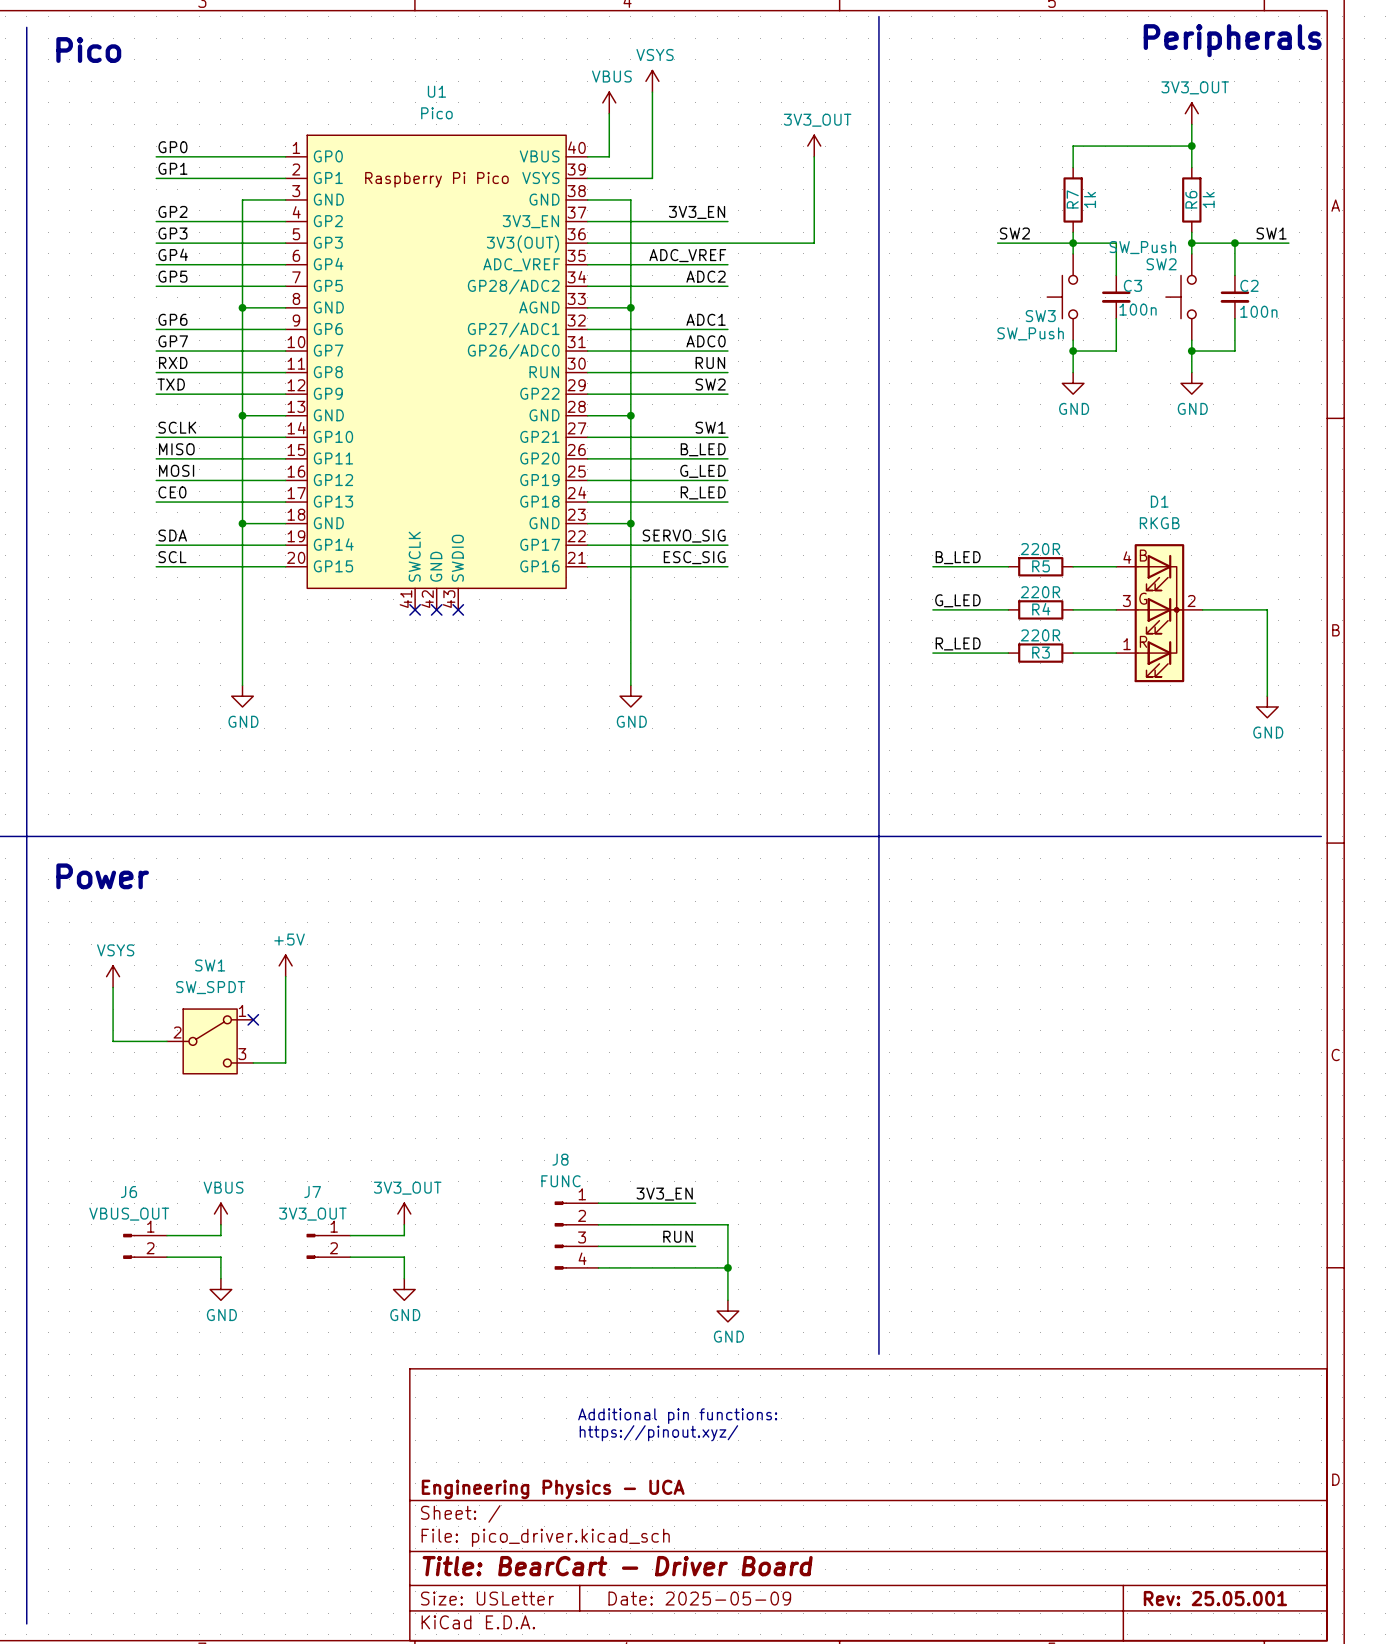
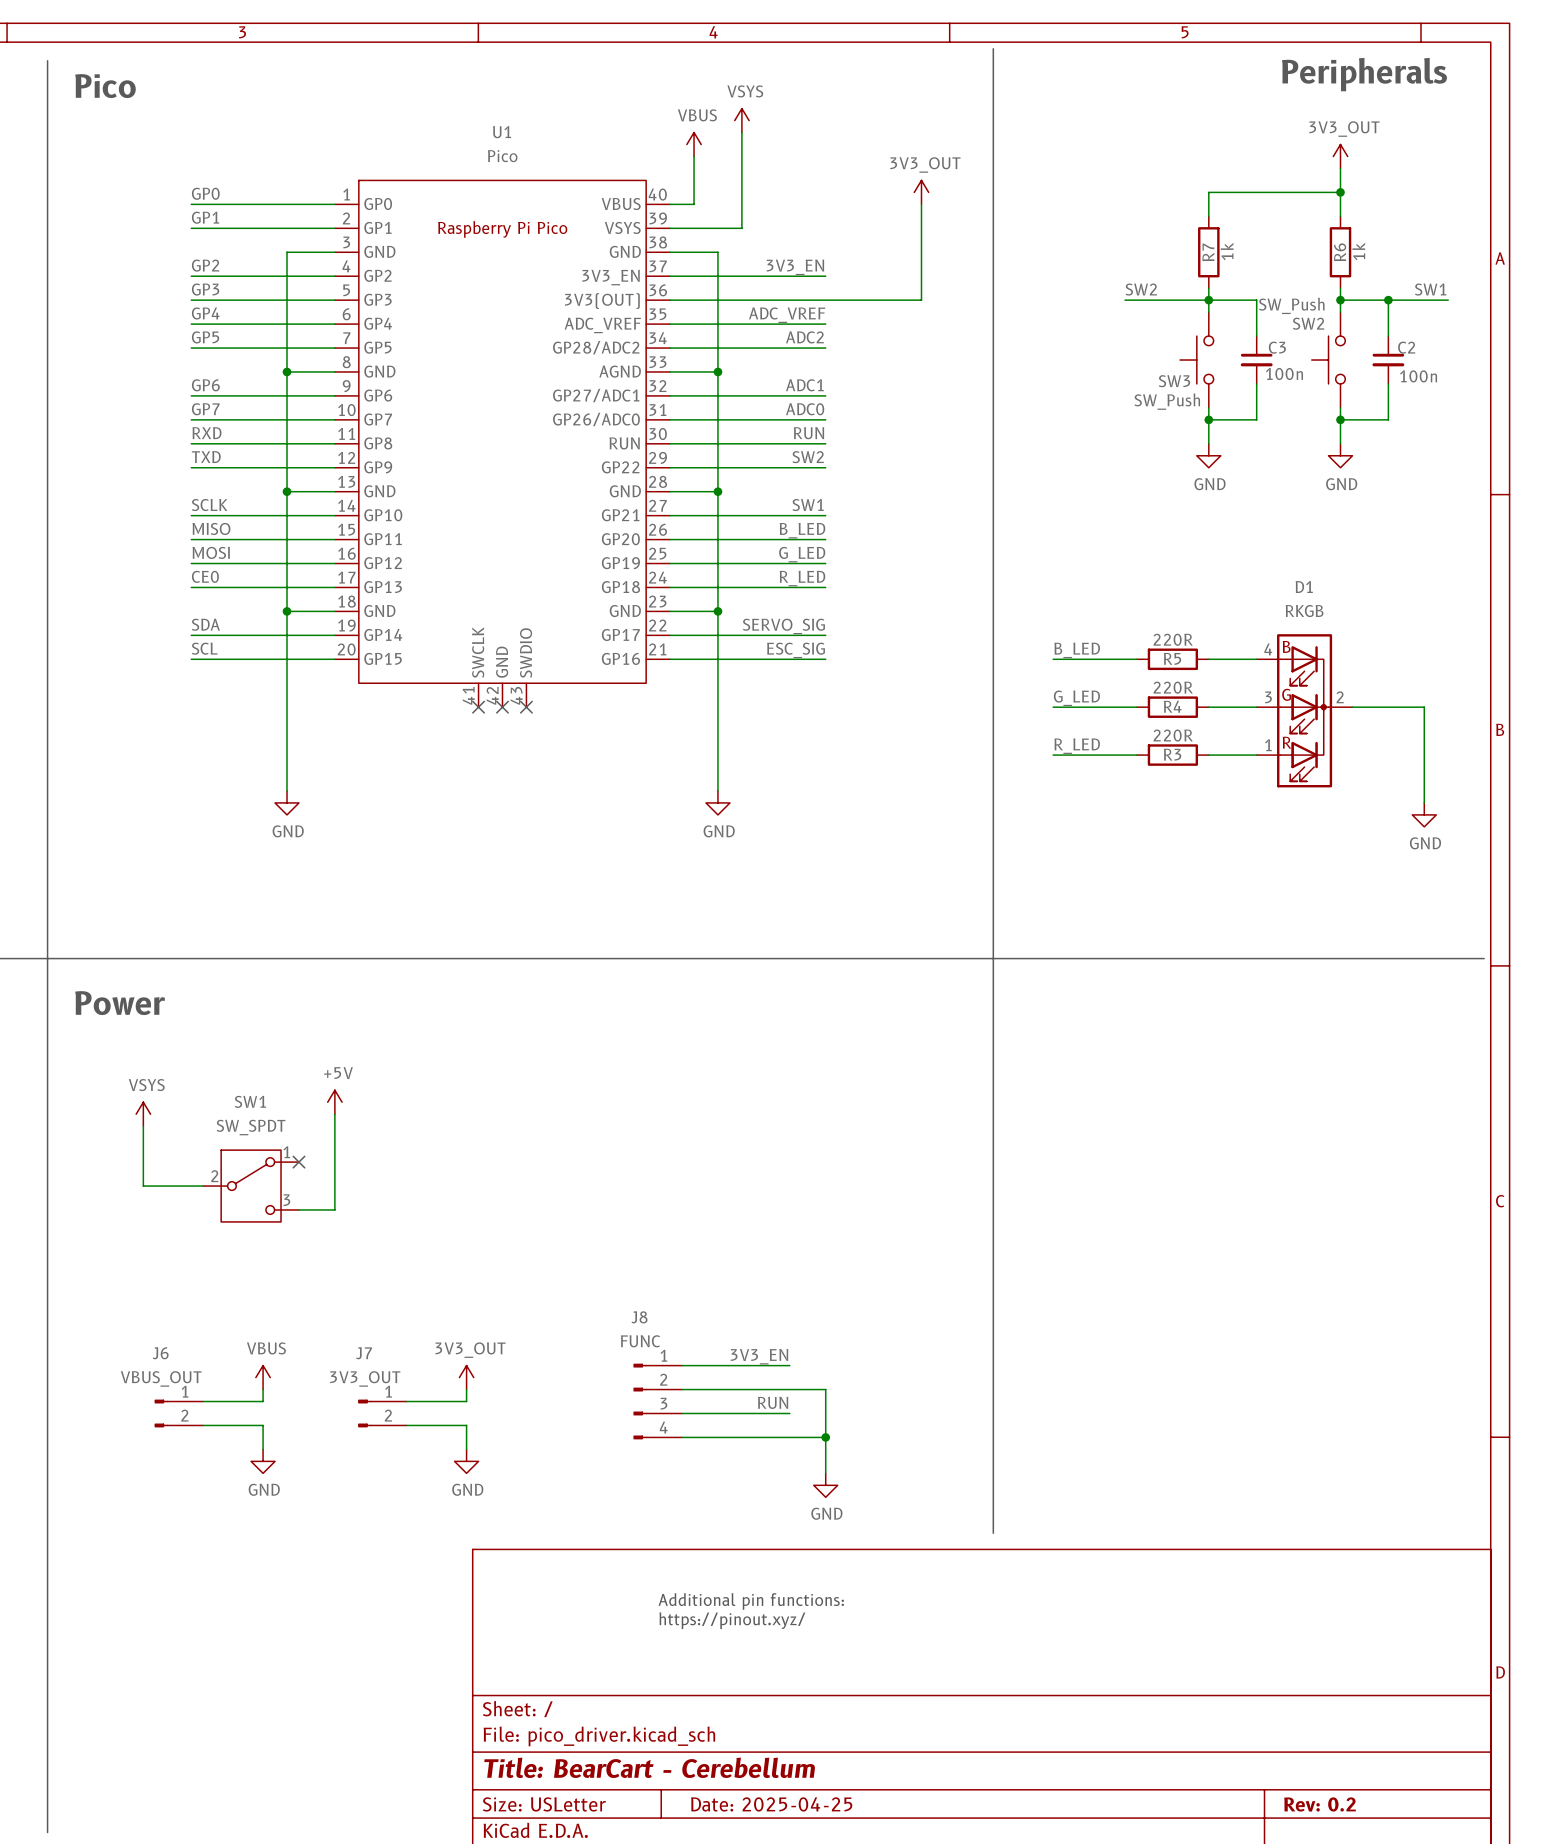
title block: Engineering Physics - UCA (553, 1489) -> none
title block: Title: BearCart - Driver Board (617, 1566) -> Title: BearCart - Cerebellum (649, 1767)
title block: Date: 2025-05-09 (699, 1598) -> Date: 2025-04-25 (771, 1804)
title block: Rev: 25.05.001 (1215, 1598) -> Rev: 0.2 (1319, 1804)

